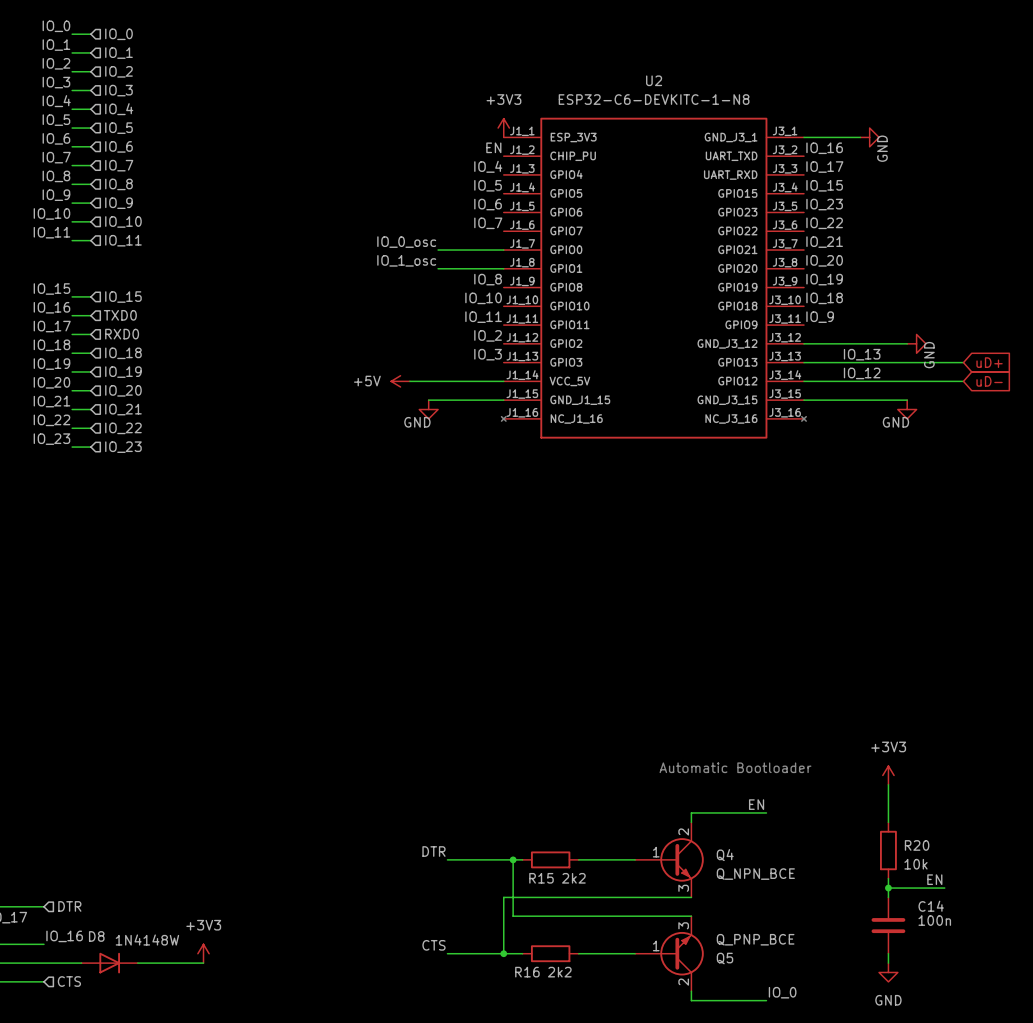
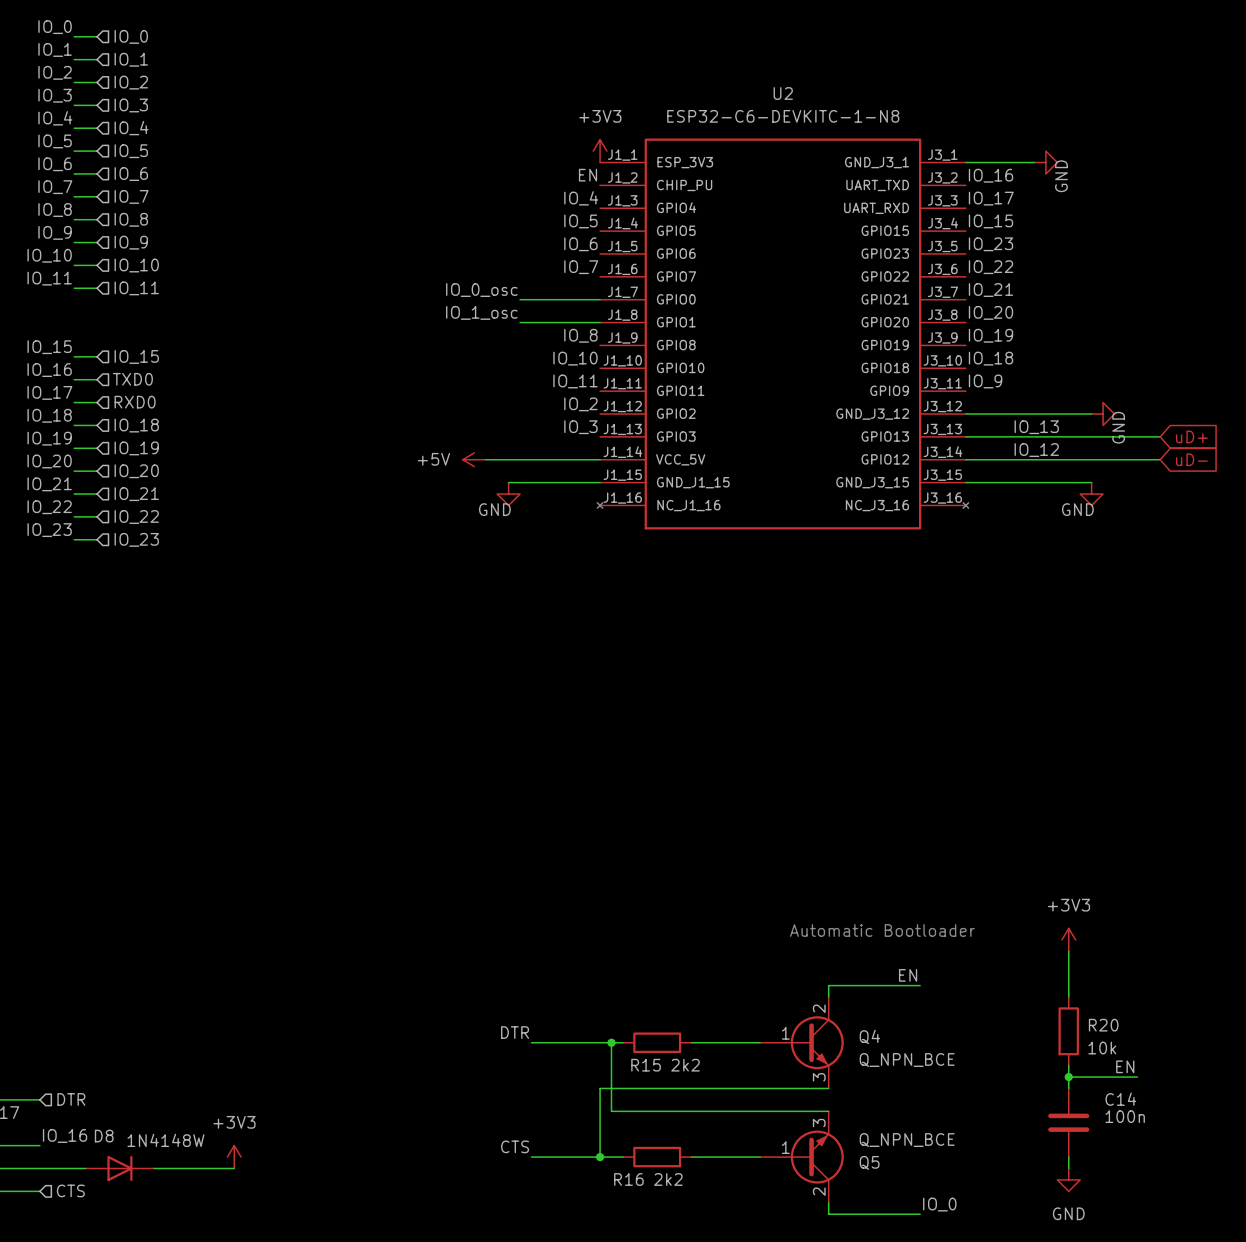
Q5 value: Q_PNP_BCE (755, 939) -> Q_NPN_BCE (907, 1140)

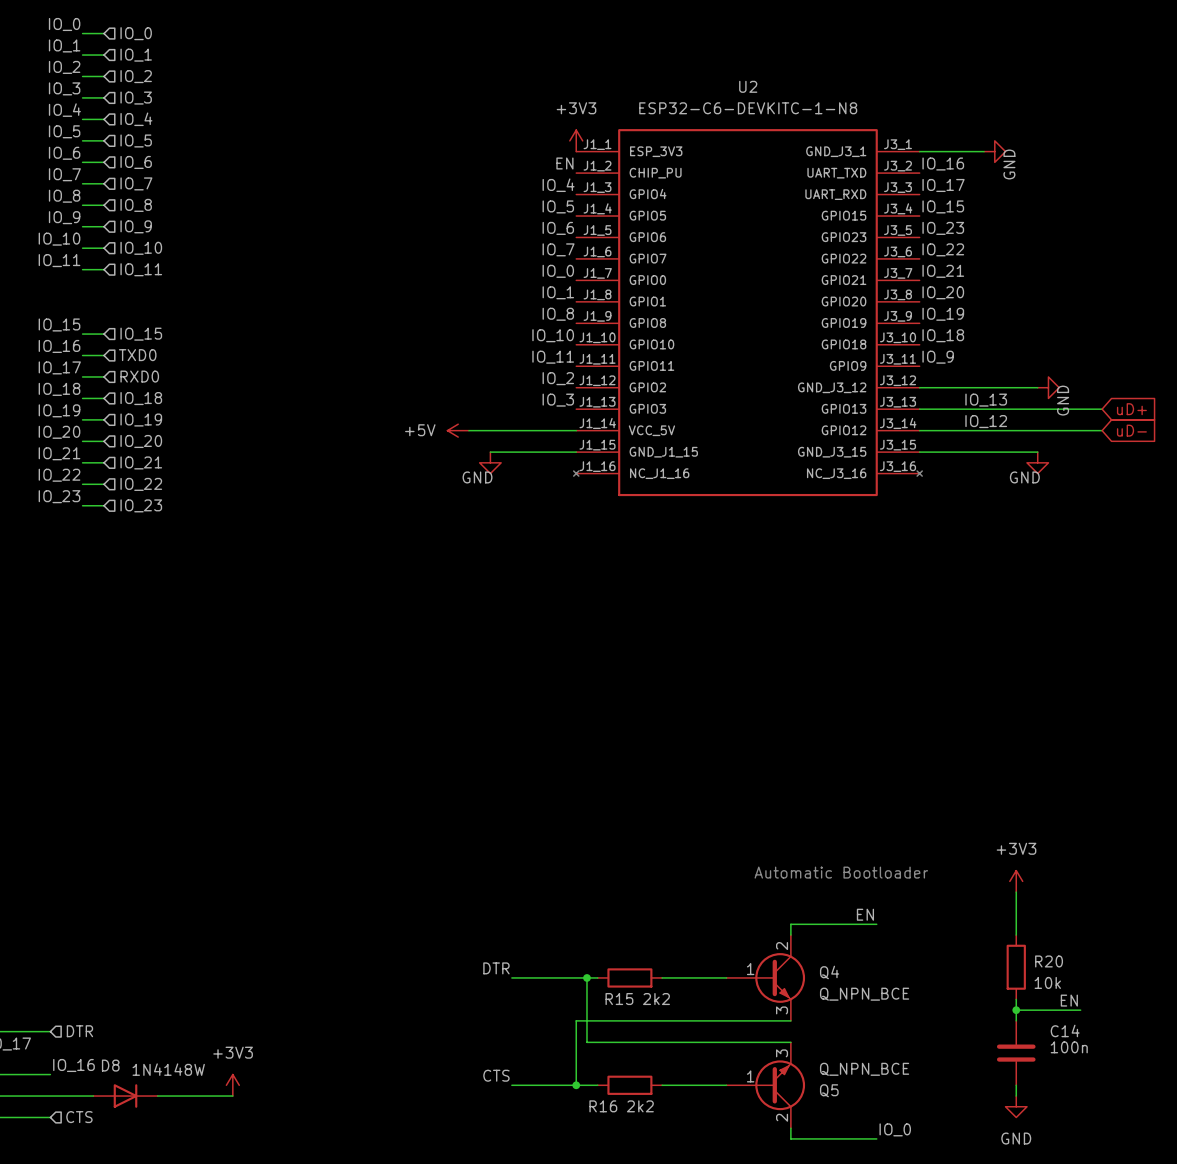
label: IO_0_osc (481, 290) -> none
label: none -> IO_0 (558, 271)
wire: (520, 299) (600, 299) -> none
label: IO_1_osc (481, 312) -> none
label: none -> IO_1 (558, 292)
wire: (520, 322) (600, 322) -> none

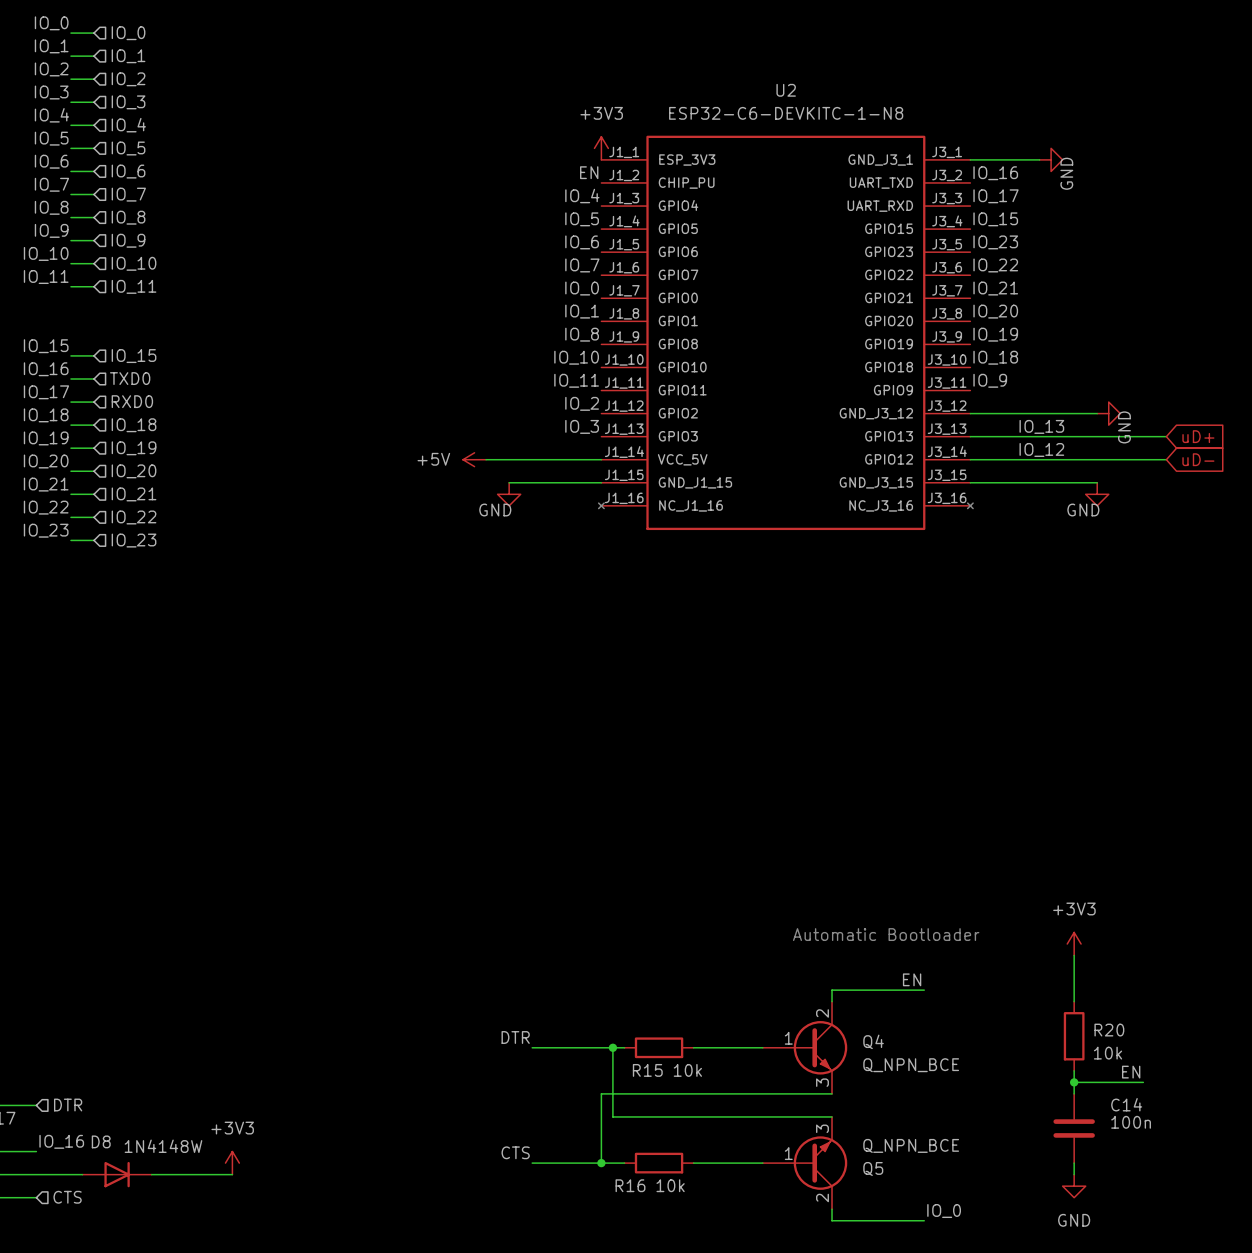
R15 value: 2k2 (656, 999) -> 10k (687, 1070)
R16 value: 2k2 (640, 1106) -> 10k (670, 1185)

